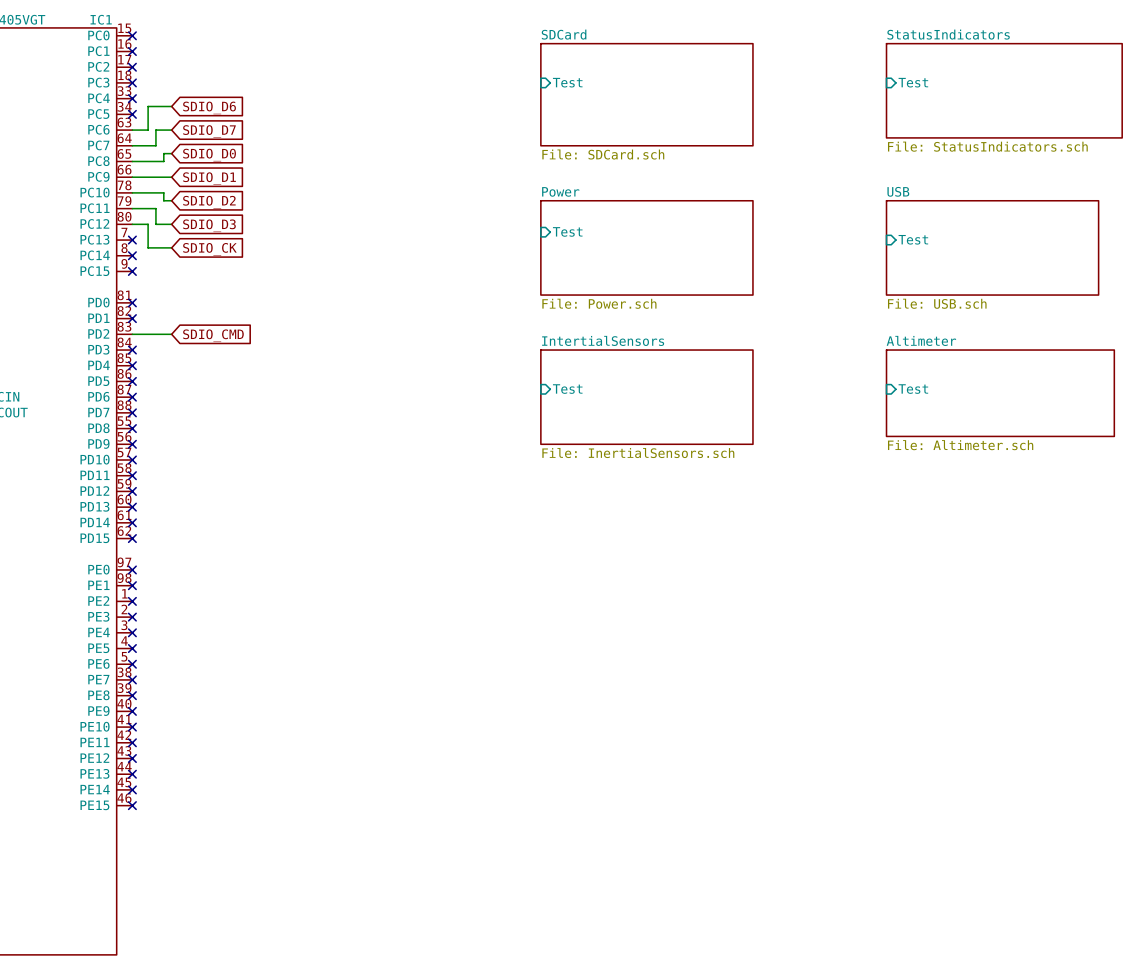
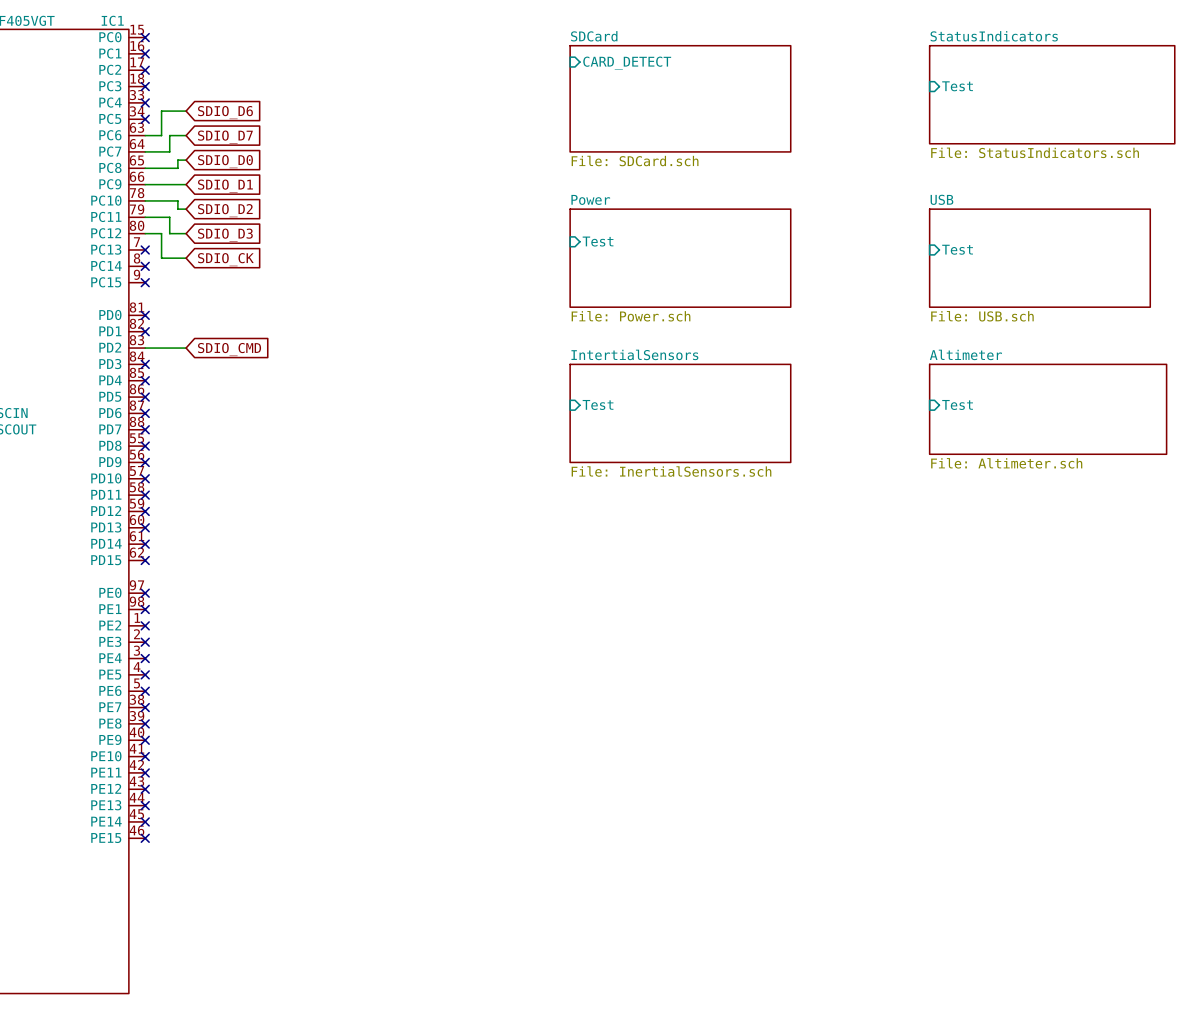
sheet pin: none -> CARD_DETECT (627, 63)
sheet pin: Test (567, 82) -> none

